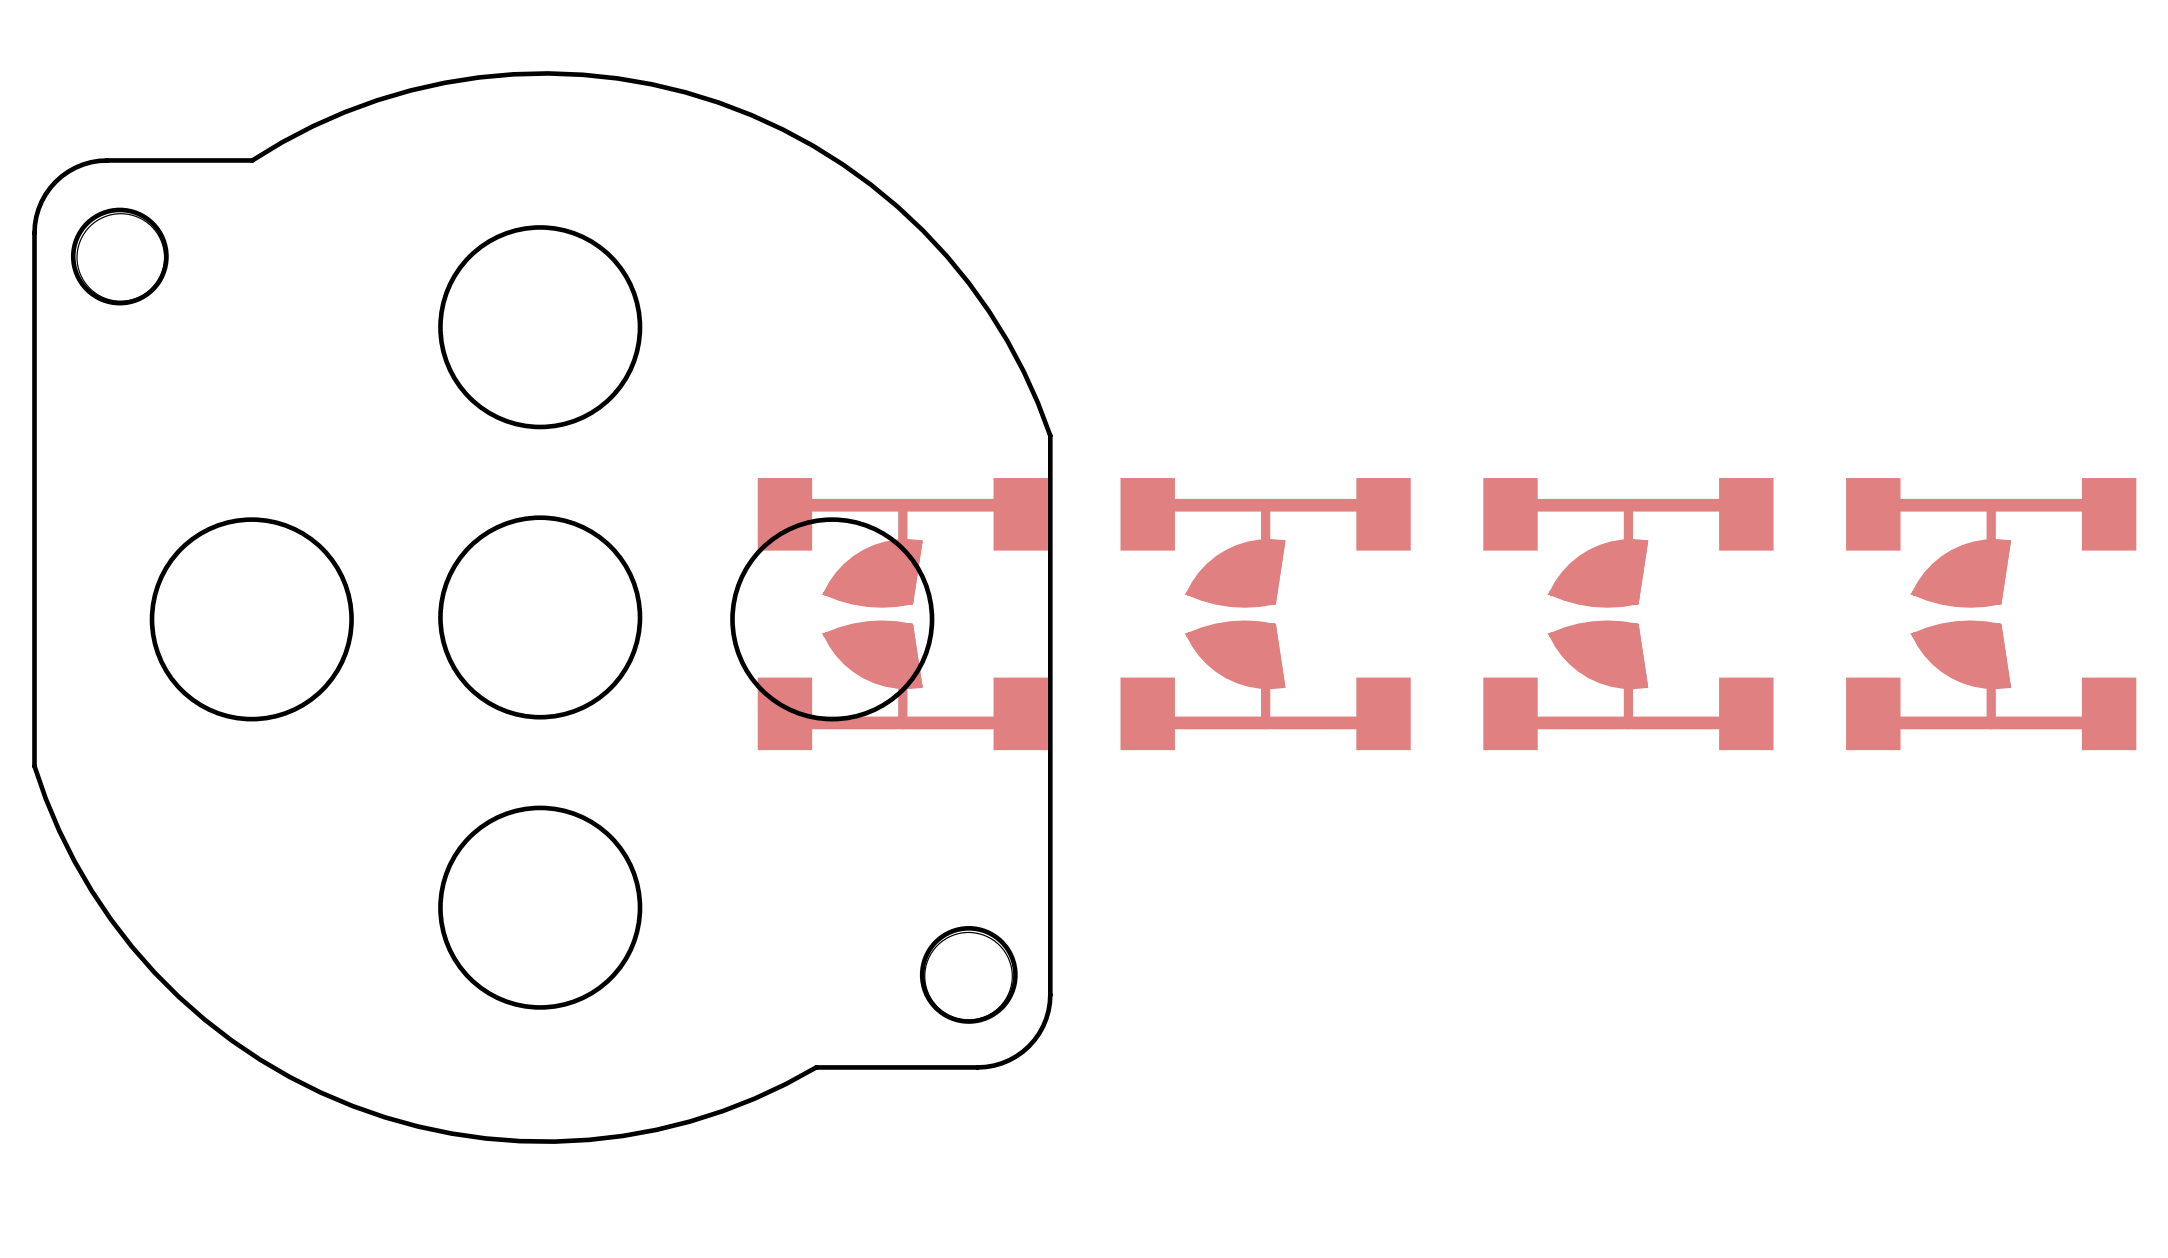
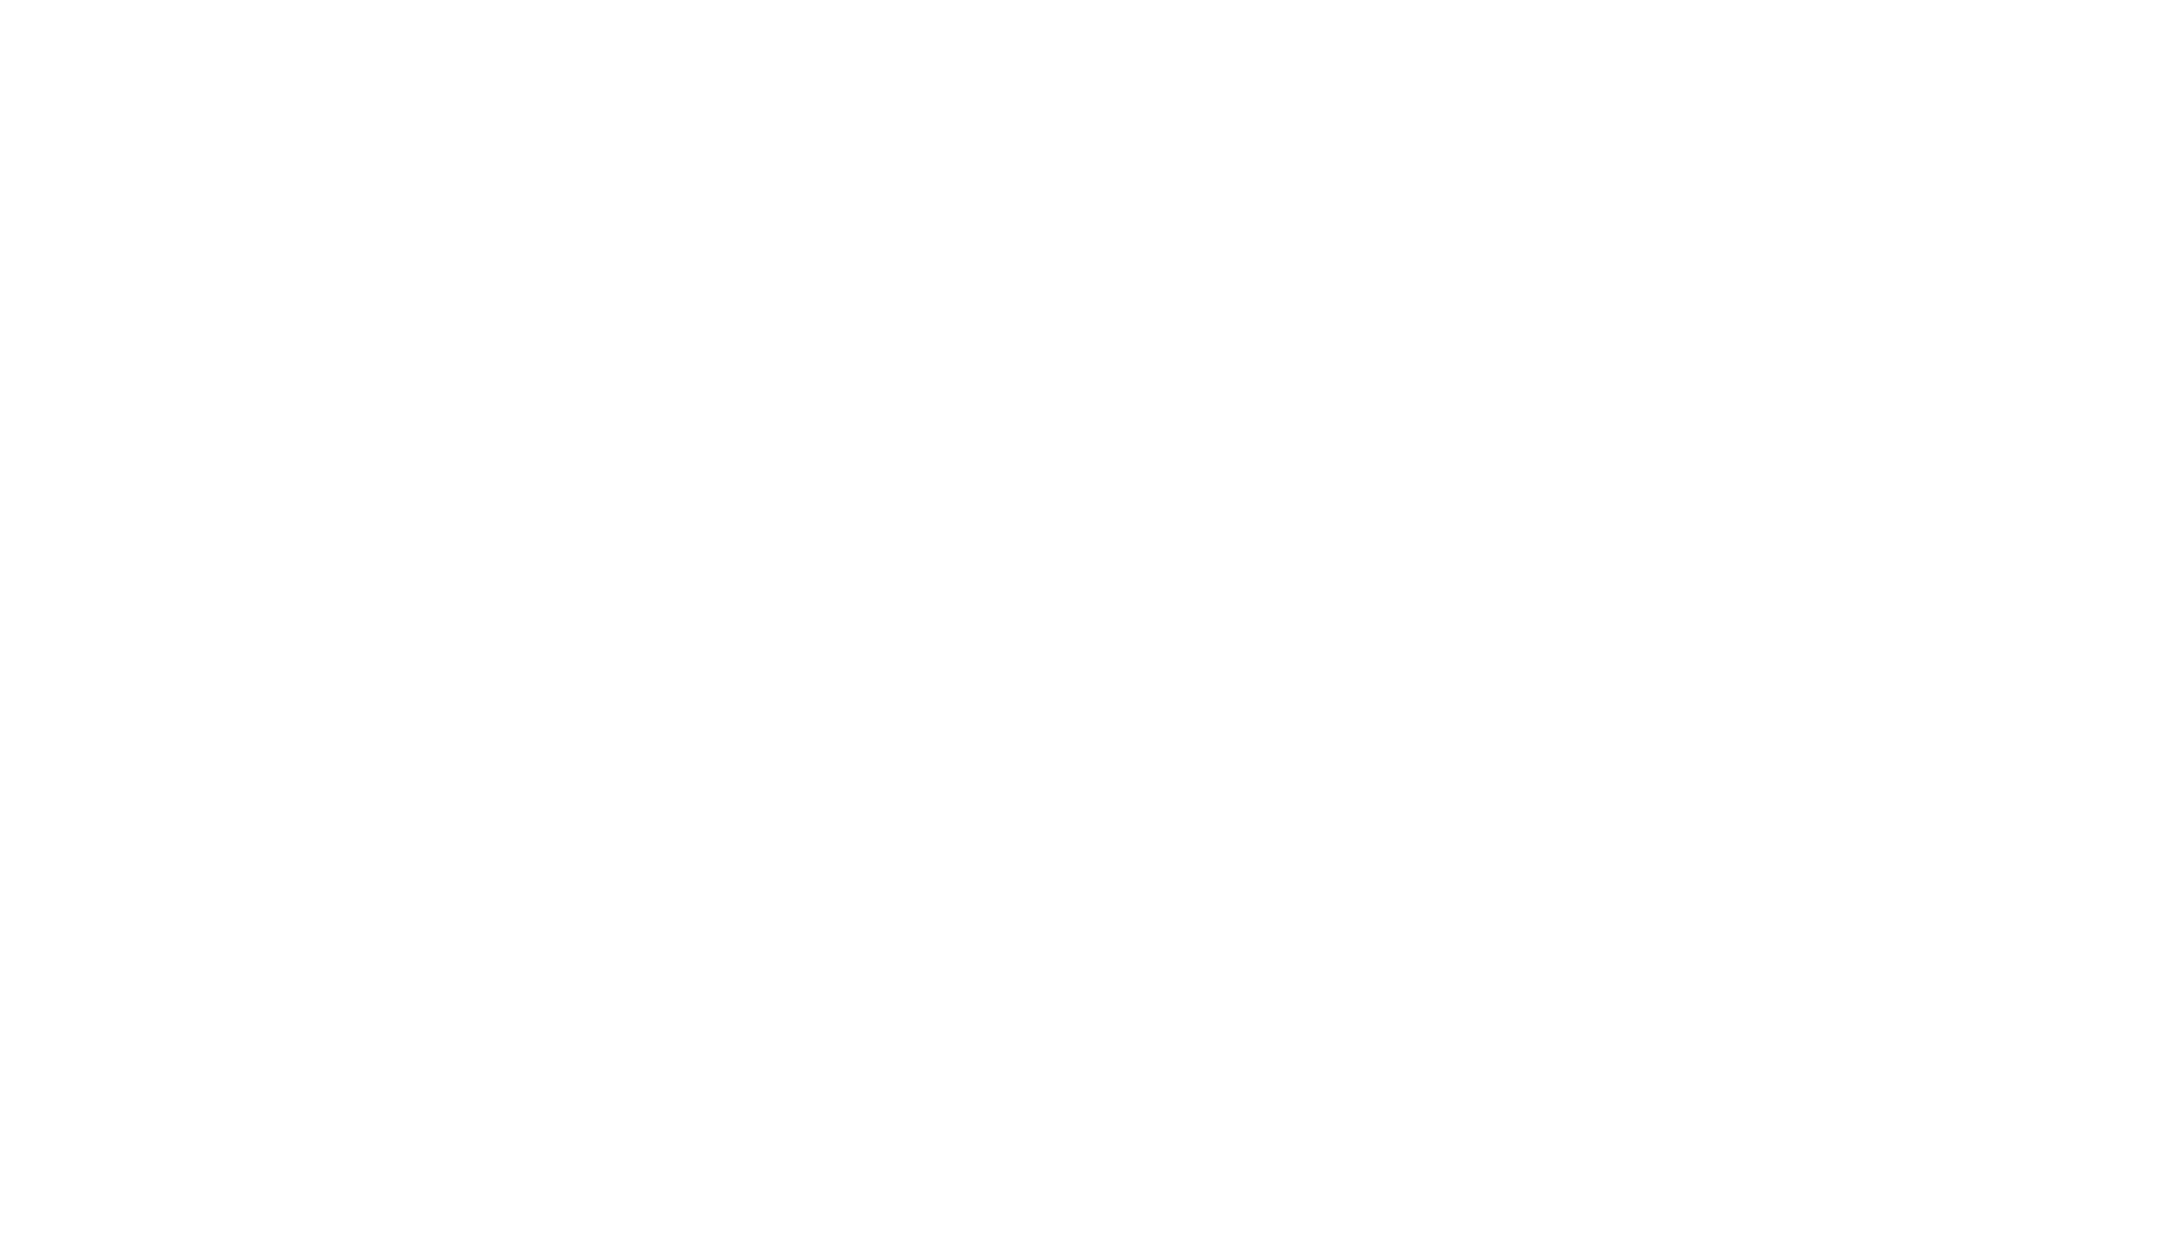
part: (542, 607) -> none
part: (902, 614) -> none
part: (1265, 614) -> none
part: (1628, 614) -> none
part: (1991, 614) -> none

